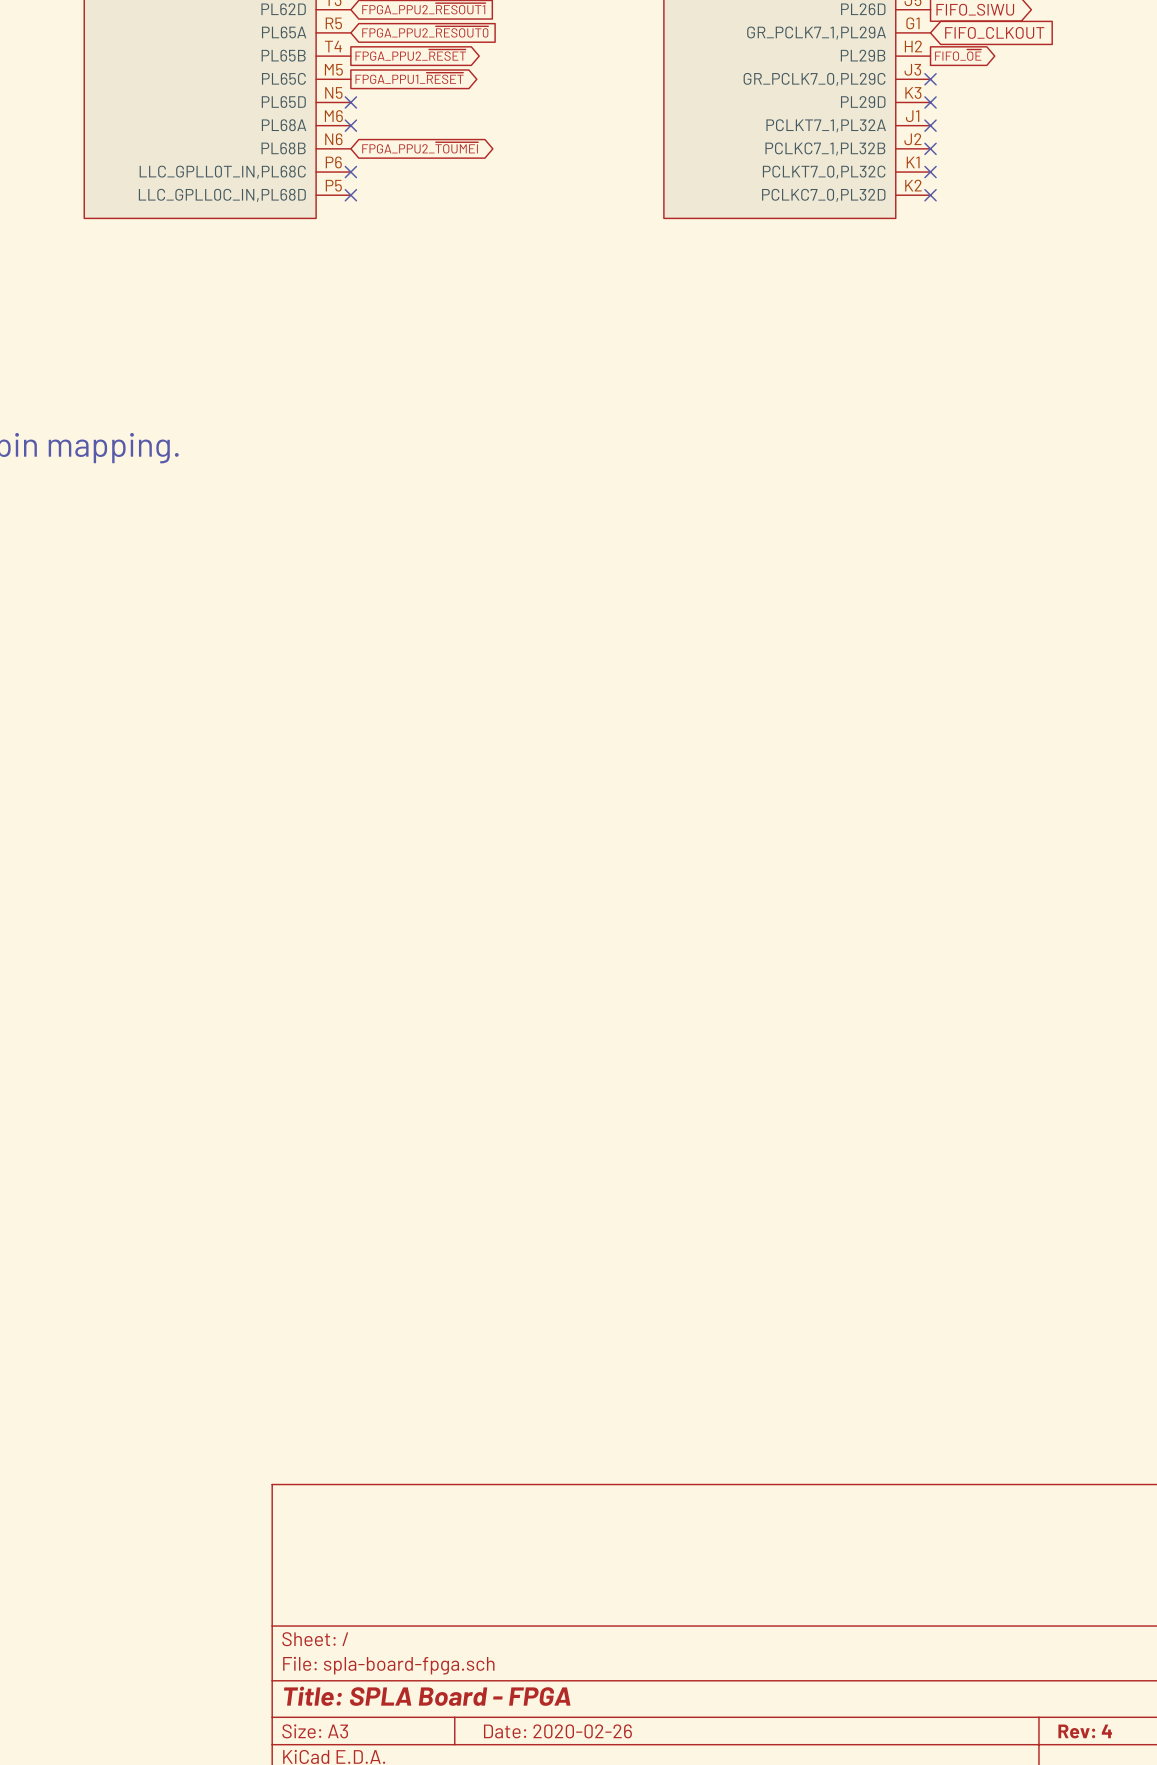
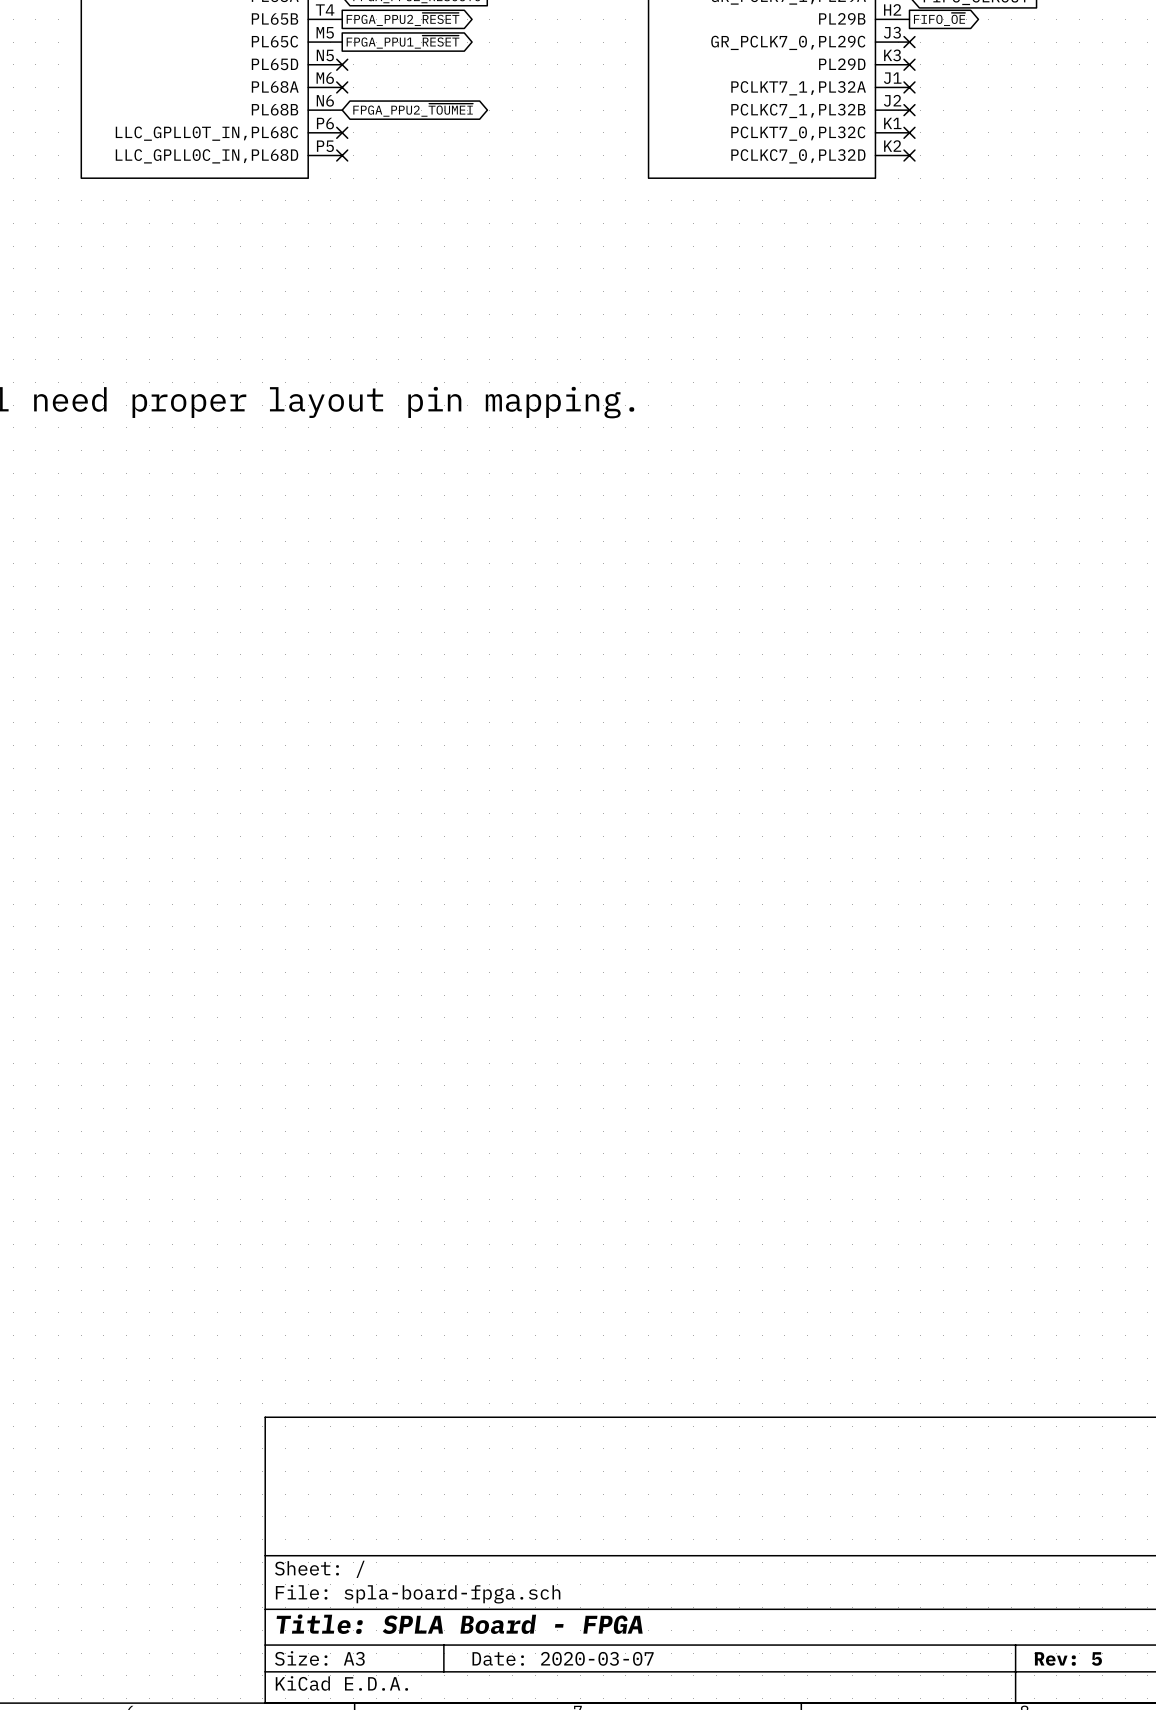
title block: Date: 2020-02-26 (557, 1731) -> Date: 2020-03-07 (563, 1658)
title block: Rev: 4 (1085, 1731) -> Rev: 5 (1068, 1658)

